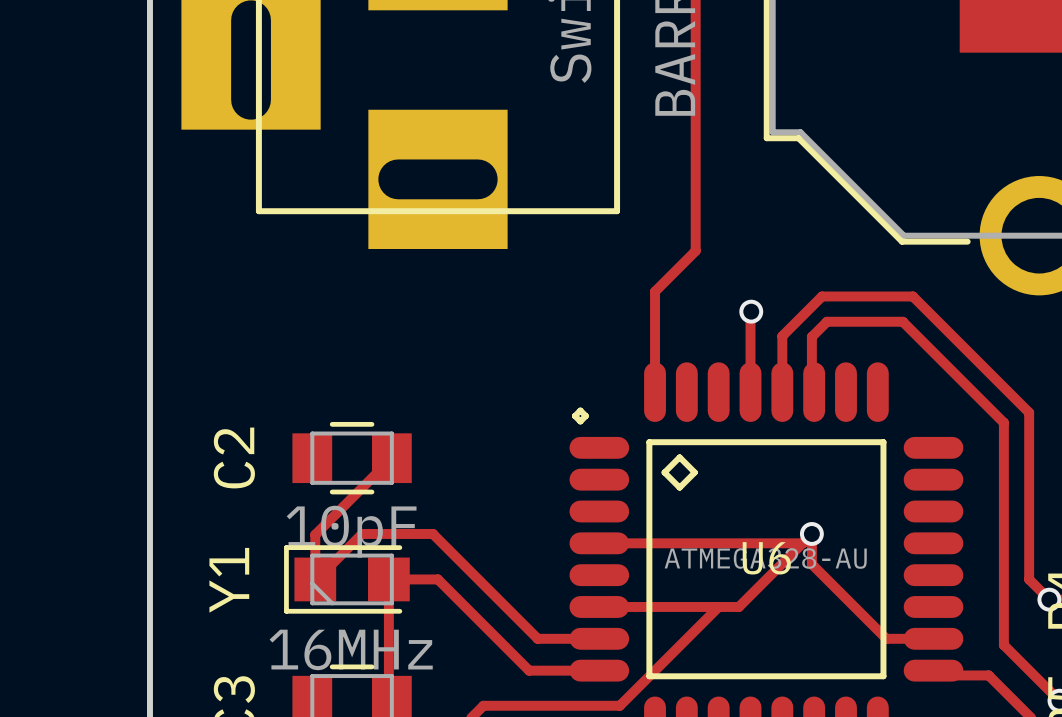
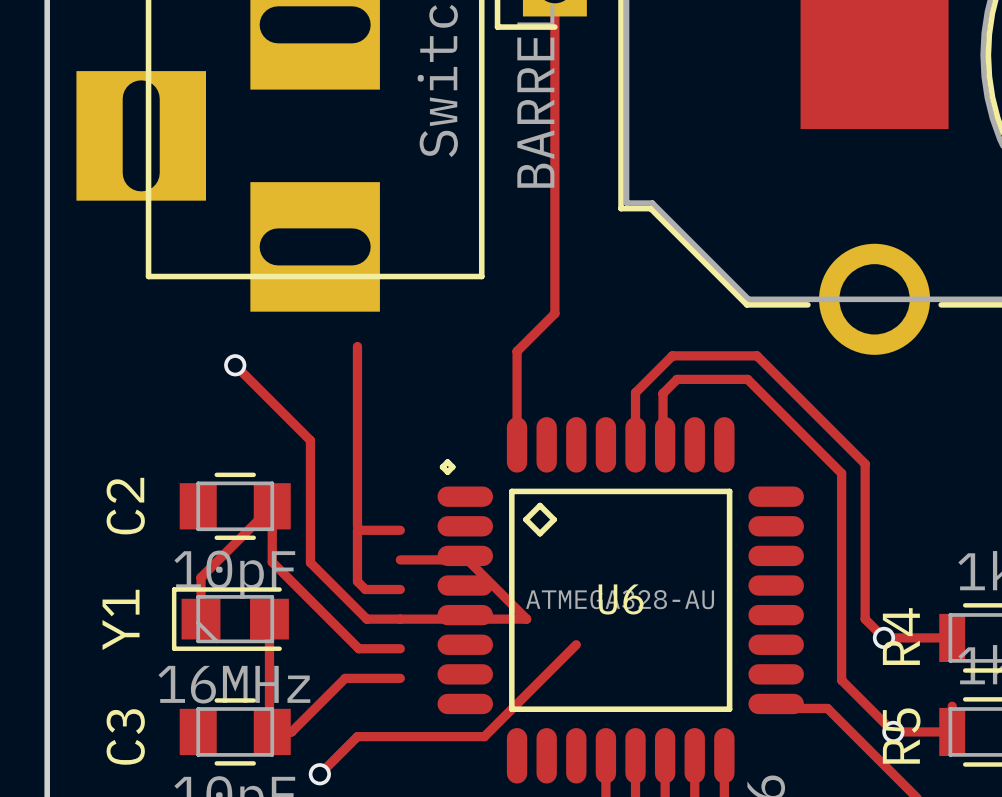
track: none -> (357, 346) (357, 526)
track: none -> (235, 365) (310, 440) (310, 562) (366, 619) (526, 619) (467, 559) (400, 559)
via: none -> (235, 365)
track: (751, 311) (750, 392) -> none
via: (751, 311) -> none
track: none -> (272, 506) (272, 562) (358, 648) (400, 648)
track: none -> (400, 530) (357, 530) (357, 581) (365, 589) (400, 589)
via: (811, 533) -> none
track: (599, 543) (802, 543) -> none
track: (315, 579) (362, 533) (432, 533) (537, 638) (599, 638) -> none
track: (388, 579) (437, 579) (529, 670) (599, 670) -> none
track: (599, 606) (738, 606) (811, 533) (811, 564) (886, 638) (933, 638) -> none
track: none -> (400, 678) (345, 678) (291, 731) (272, 731)

